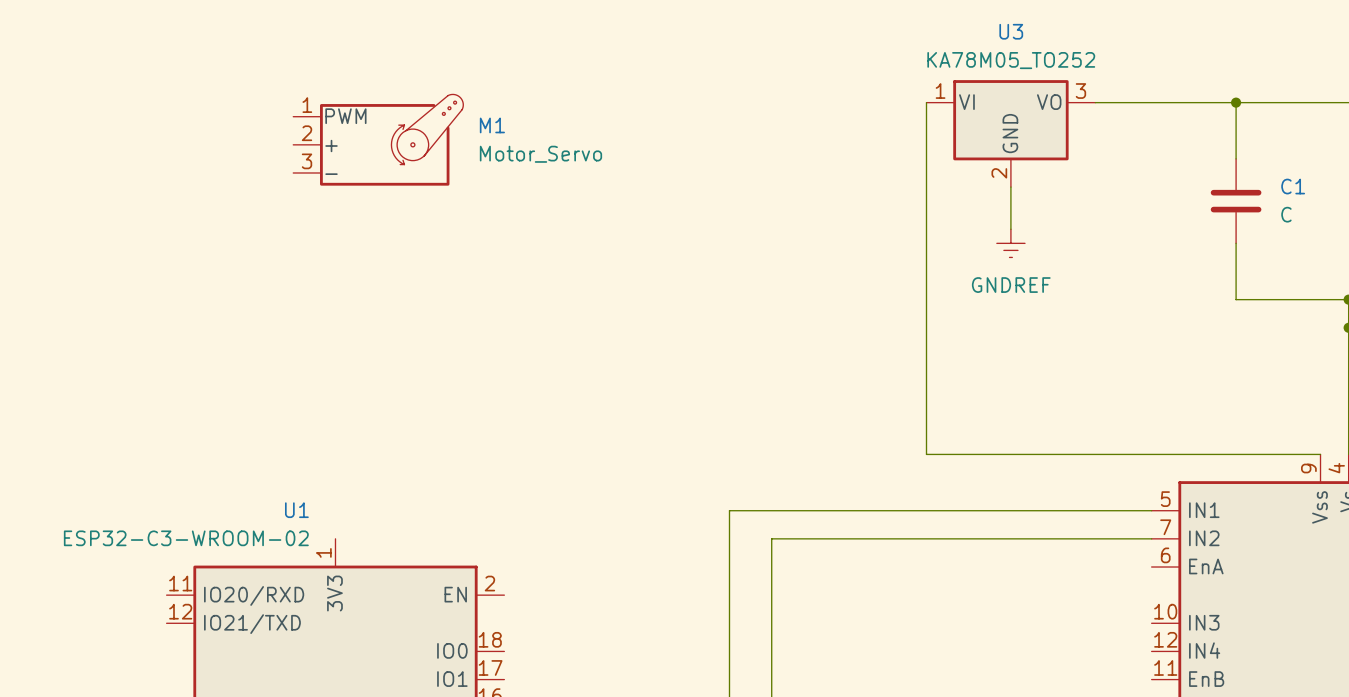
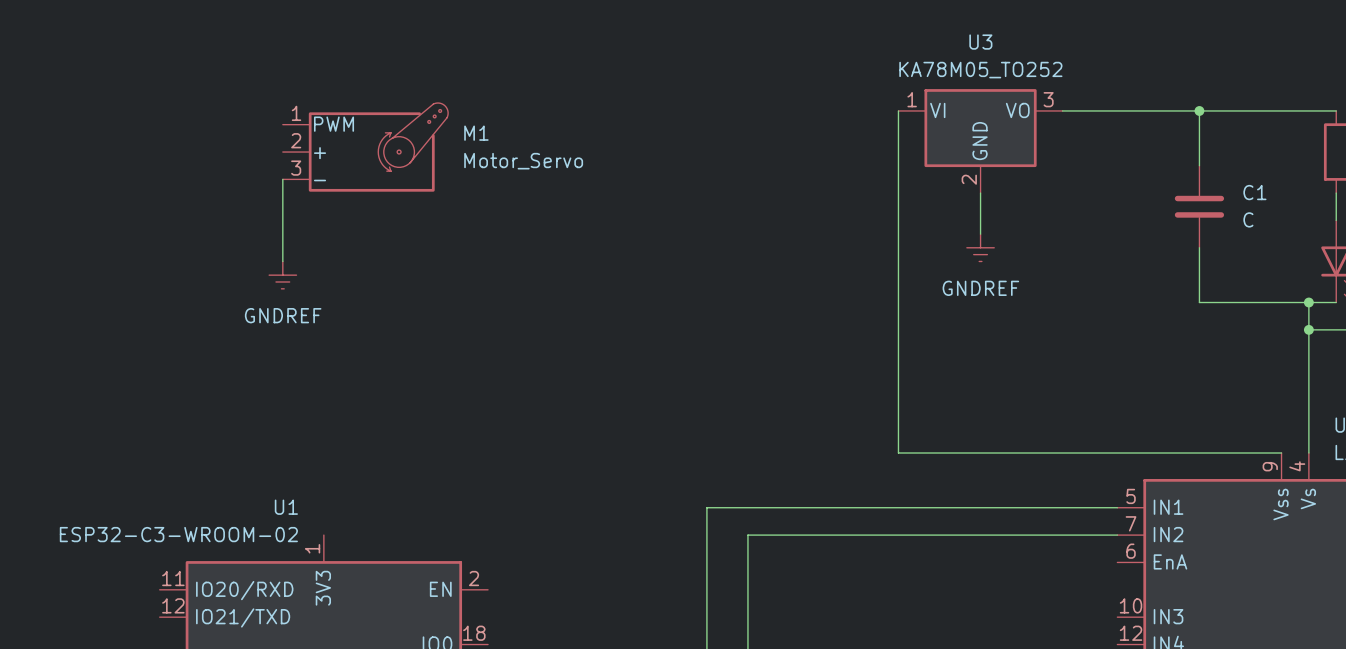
wire: none -> (282, 179) (282, 261)
power symbol: none -> GNDREF (282, 275)

